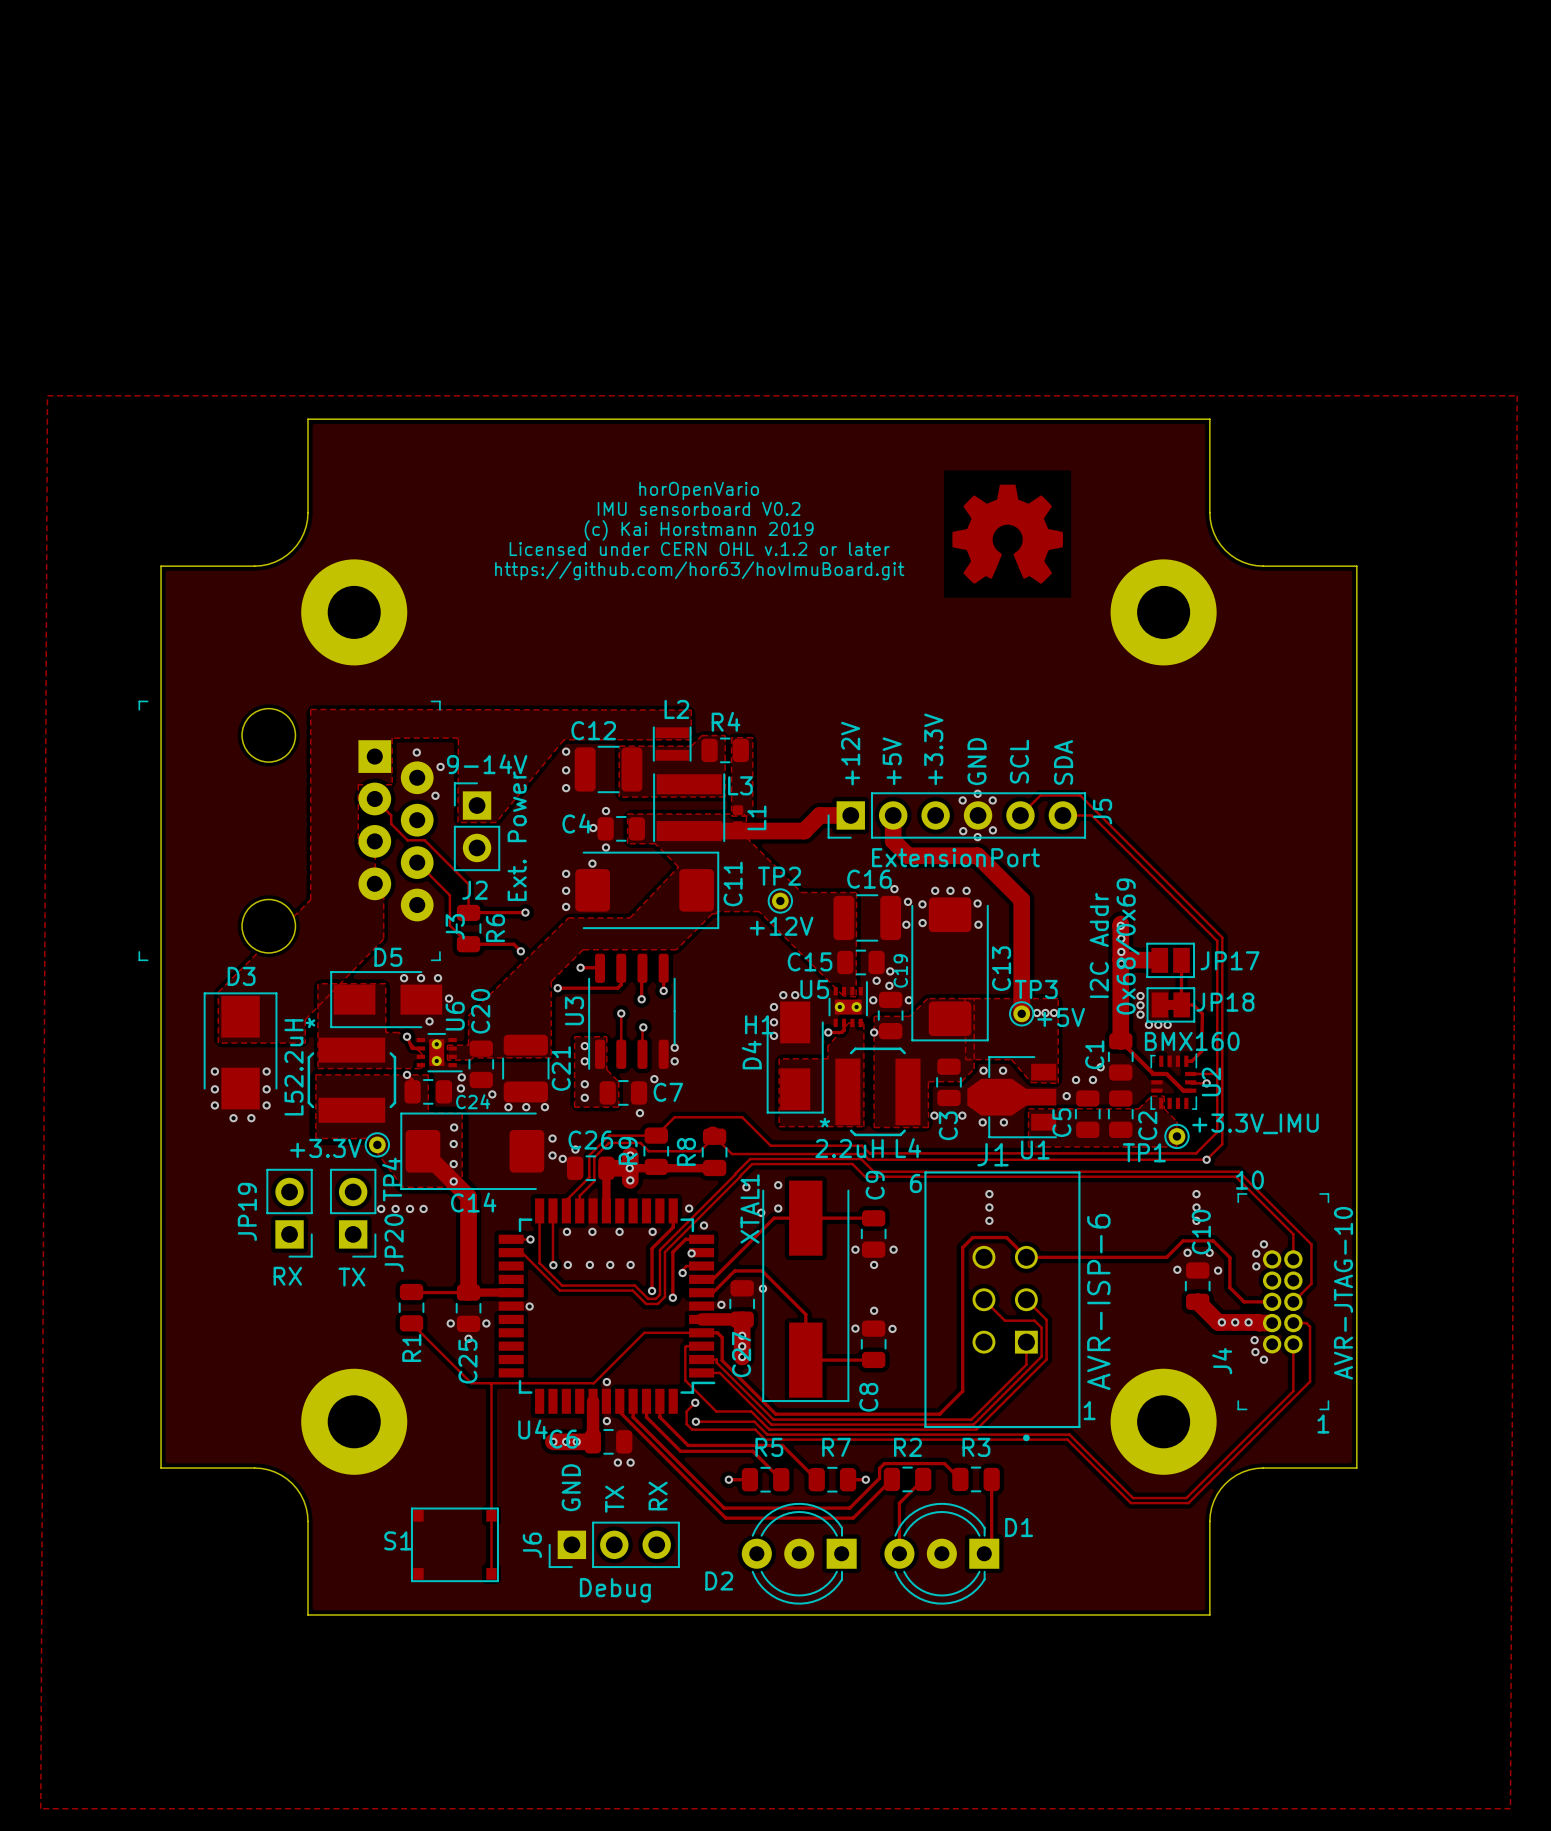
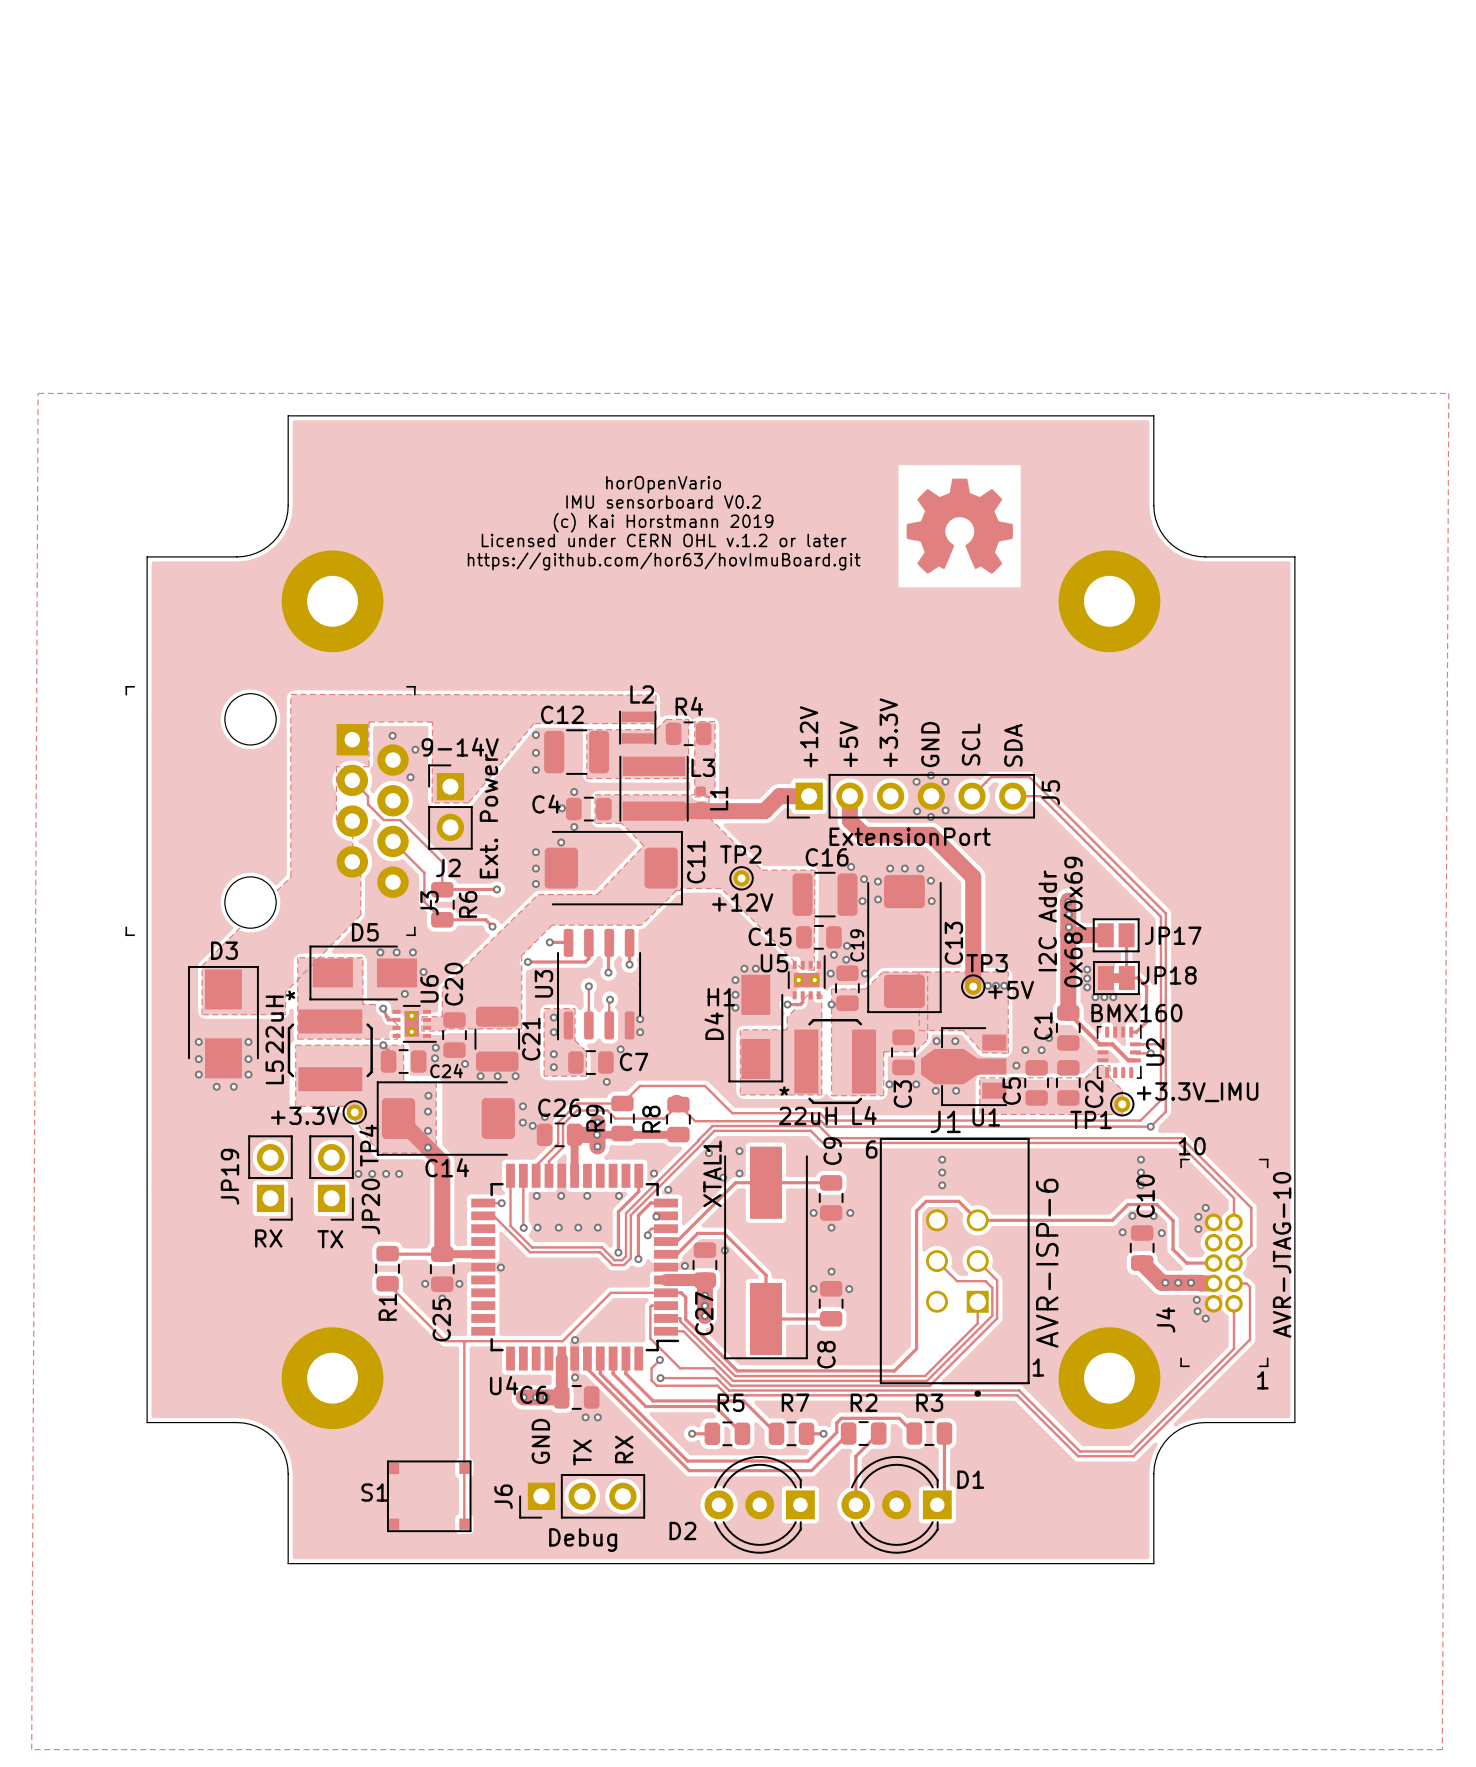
L5 value: 2.2uH (294, 1053) -> 22uH (274, 1024)
L4 value: 2.2uH (849, 1148) -> 22uH (807, 1115)

